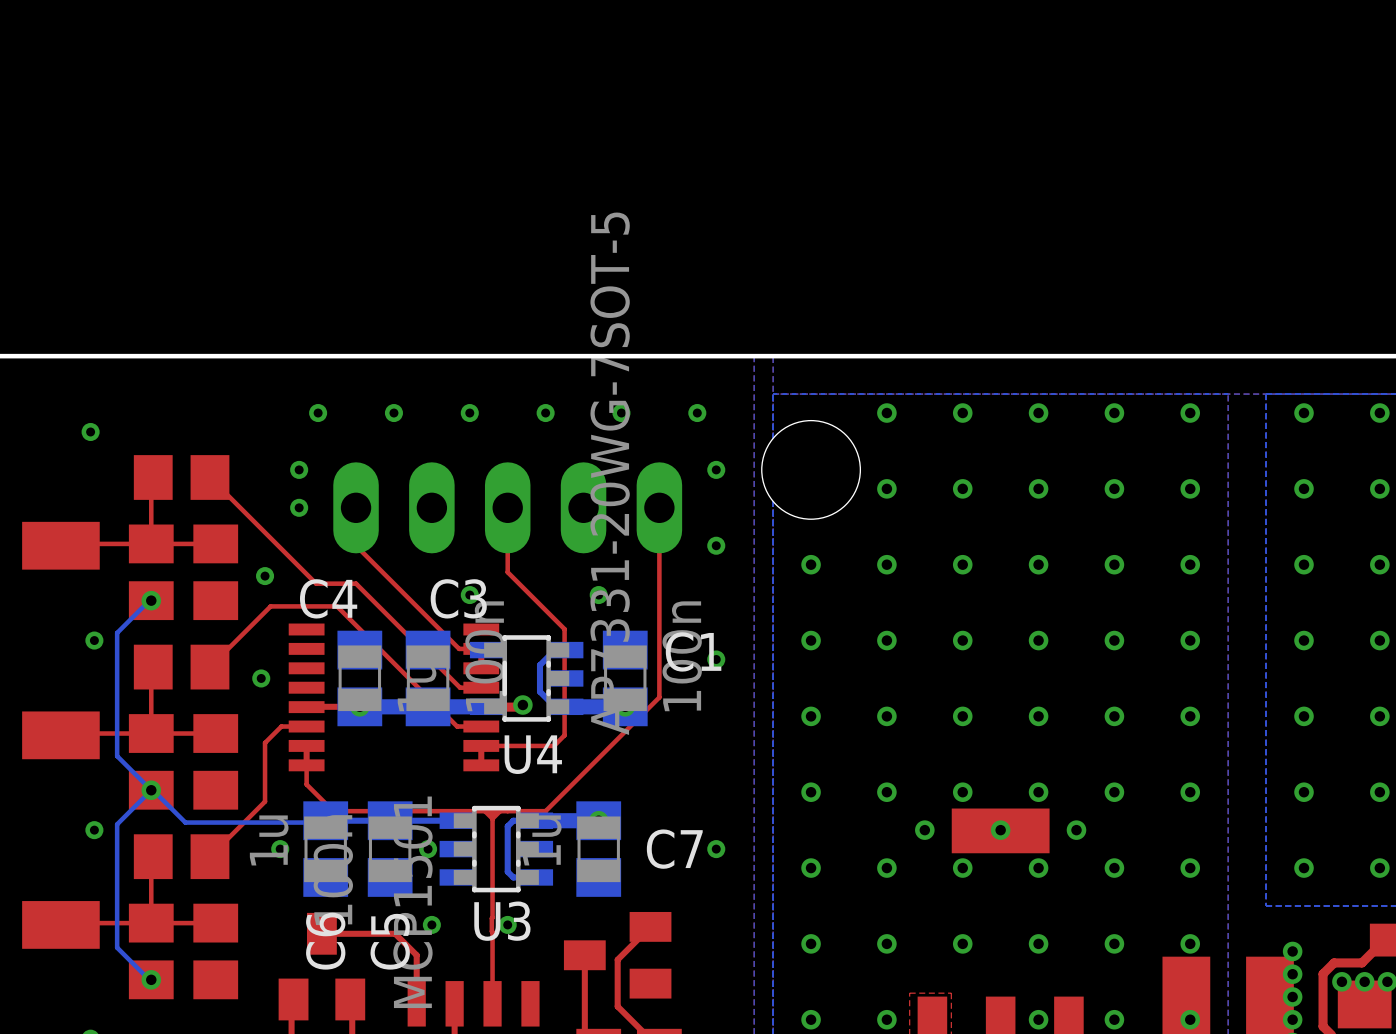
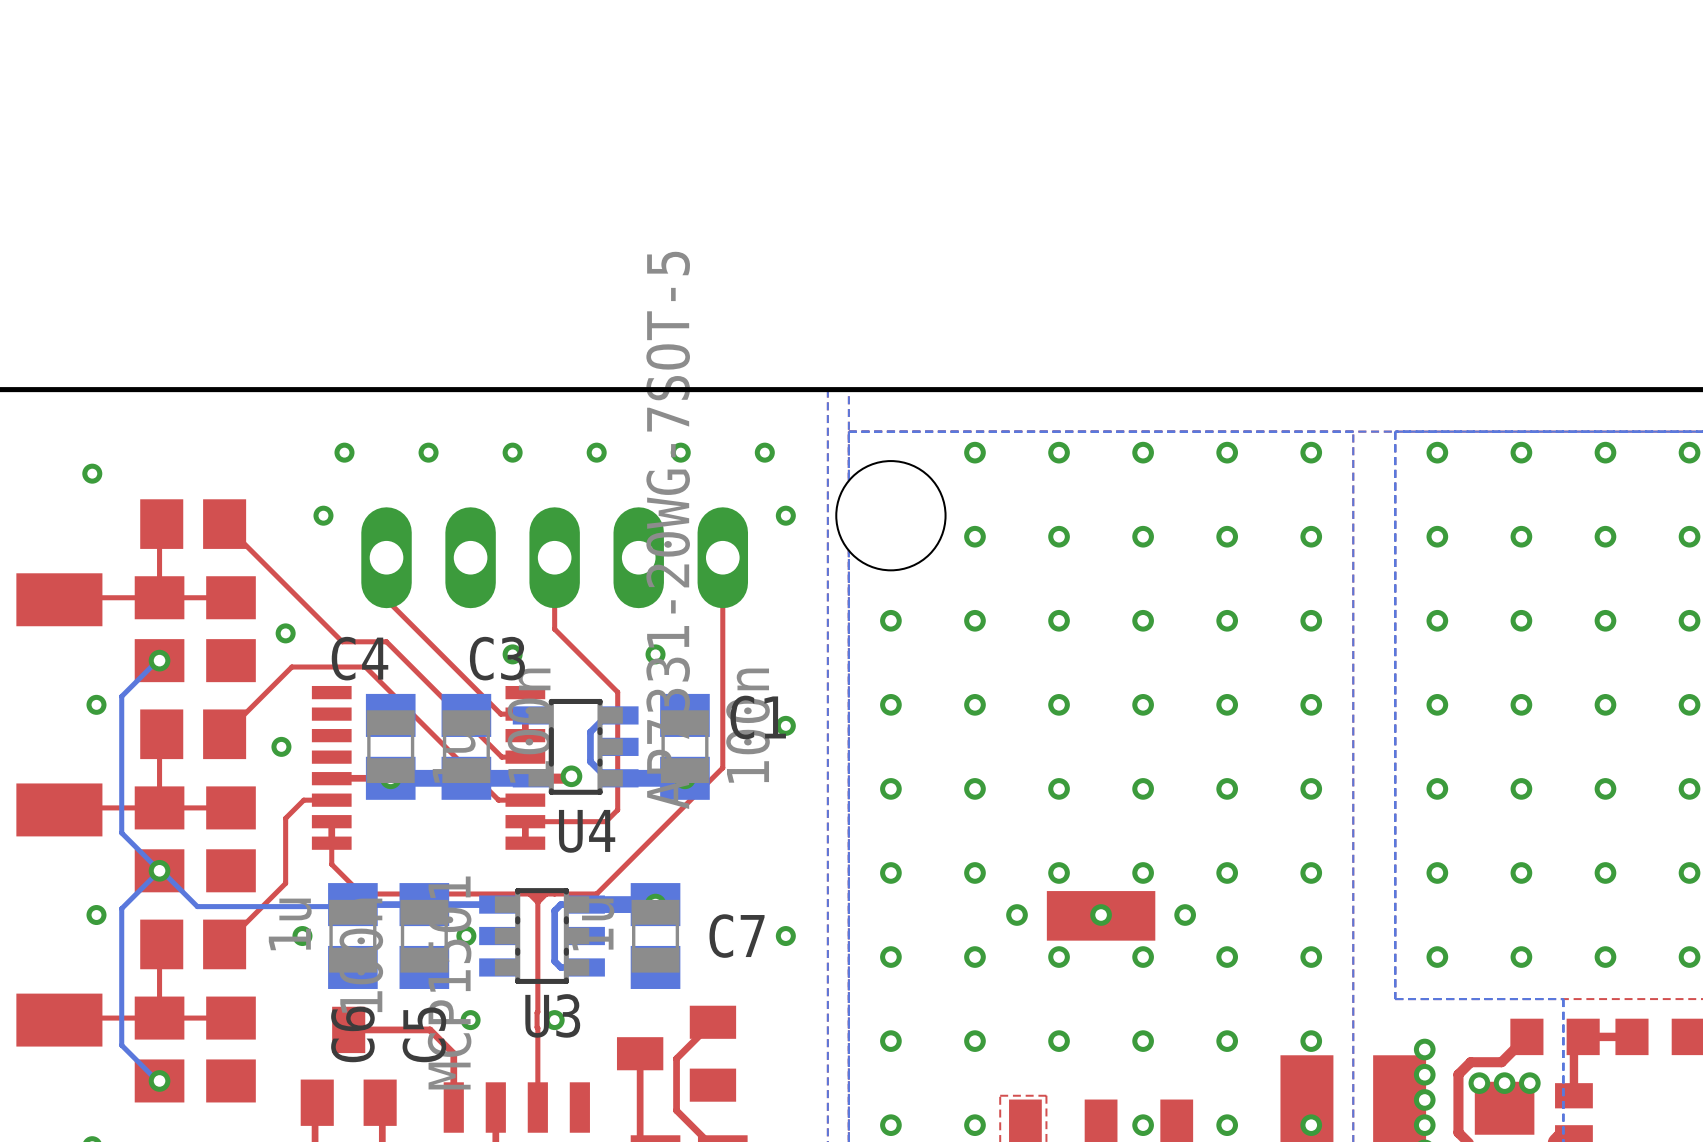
via: (299, 507) -> none
via: (716, 545) -> none

